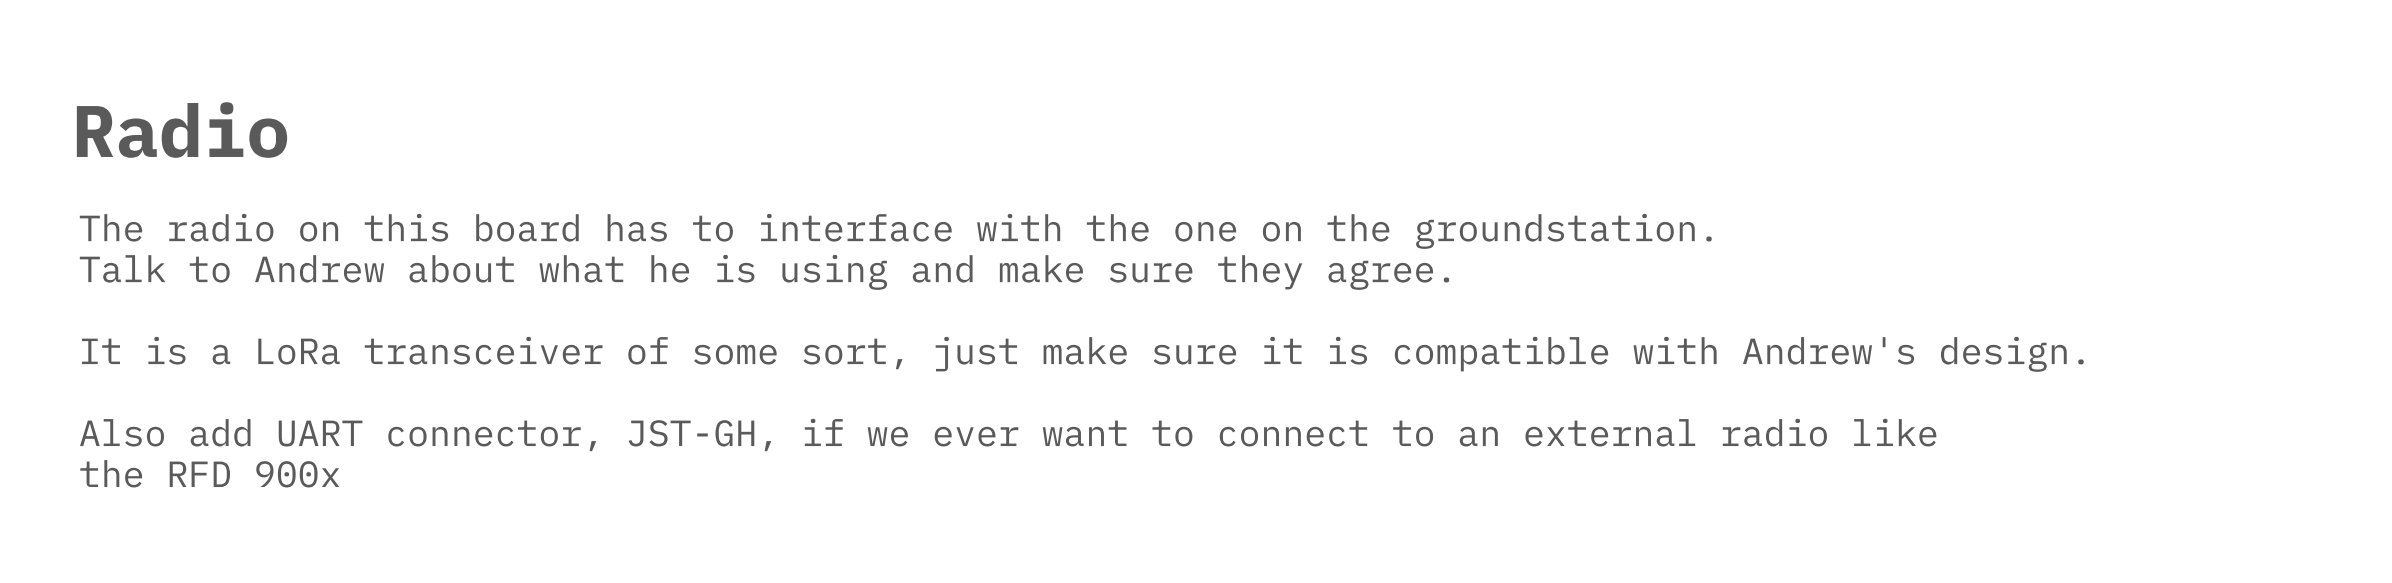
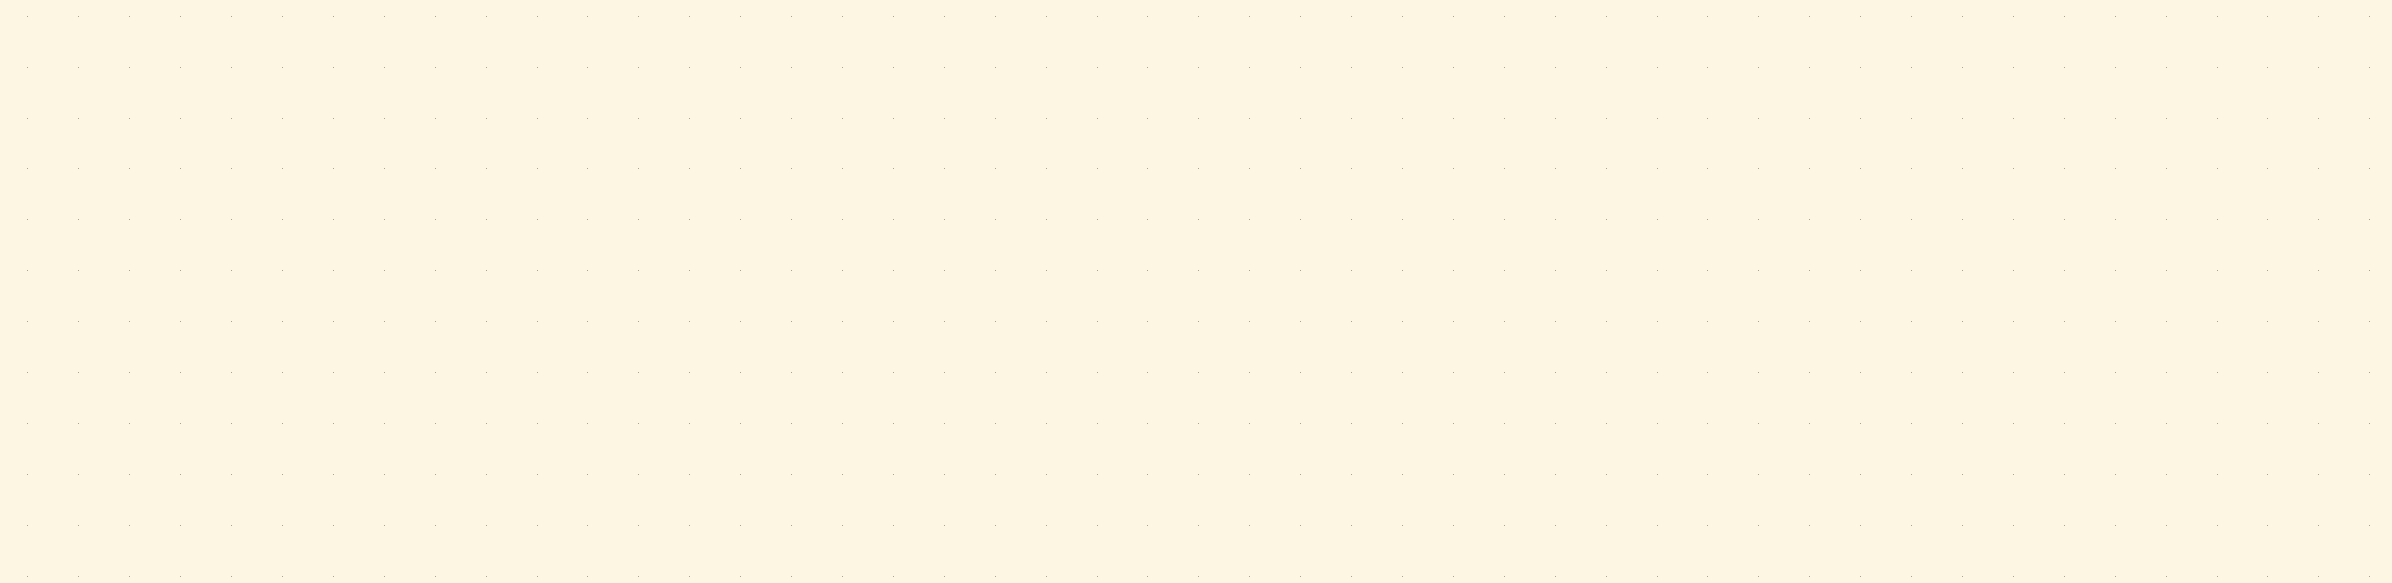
text: Radio (181, 130) -> none
text: The radio on this board has to interface with the one on the groundstation. (895, 231) -> none
text: Talk to Andrew about what he is using and make sure they agree. (764, 272) -> none
text: It is a LoRa transceiver of some sort, just make sure it is compatible with Andrew's design. (1082, 354) -> none
text: Also add UART connector, JST-GH, if we ever want to connect to an external radio like (1008, 434) -> none
text: the RFD 900x (209, 473) -> none

